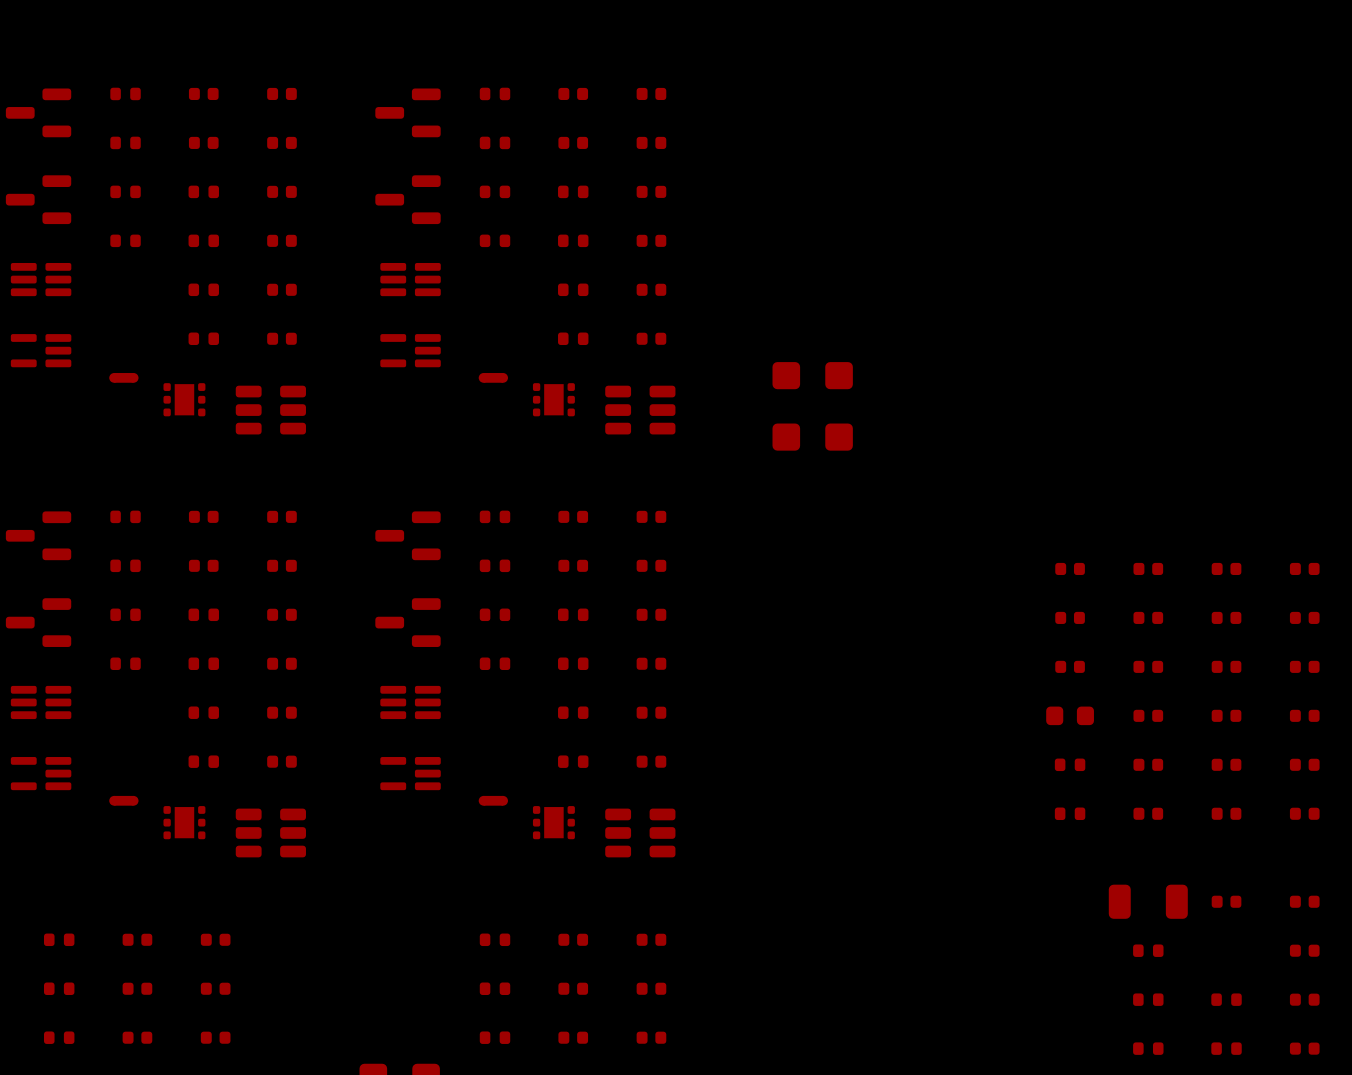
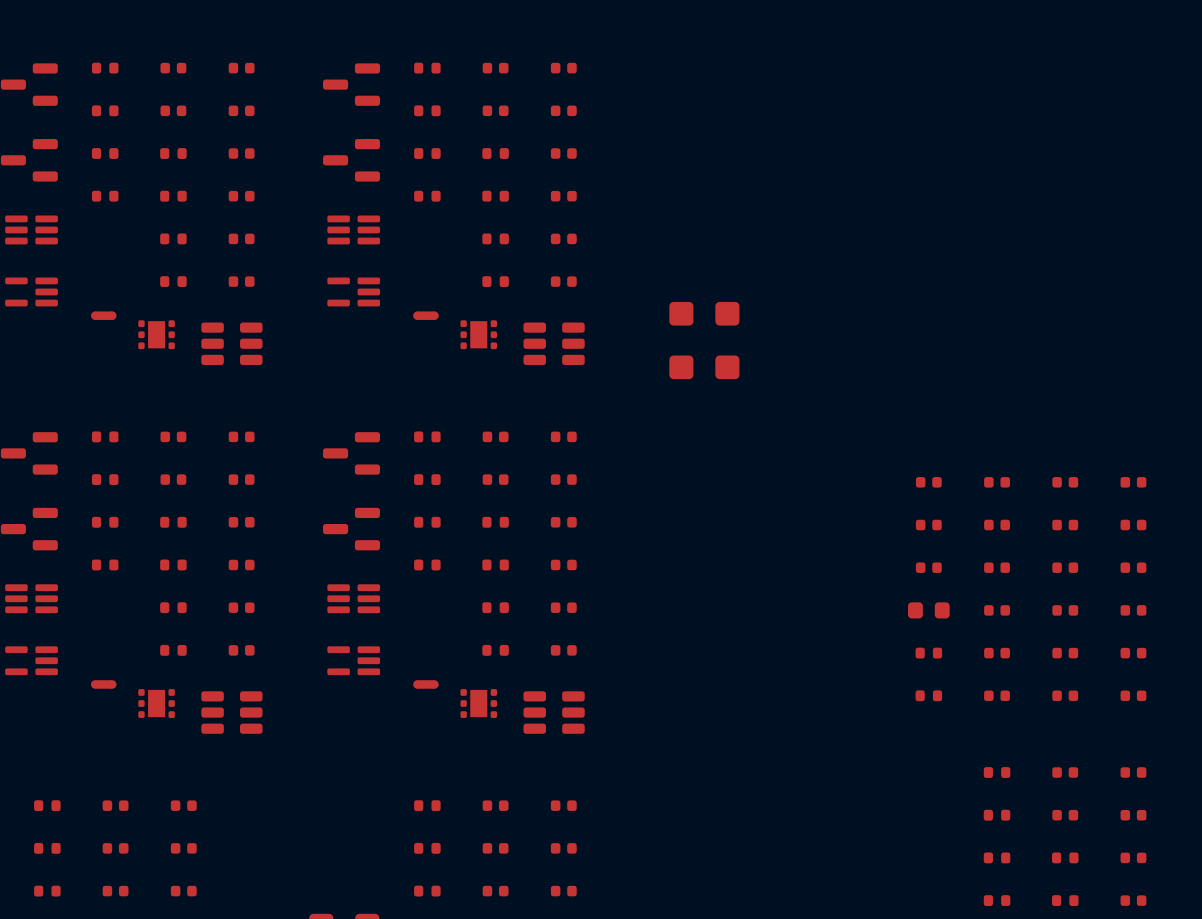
part footprint: [1108, 884, 1188, 919] -> [983, 767, 1011, 778]
part: none -> (1065, 815)

